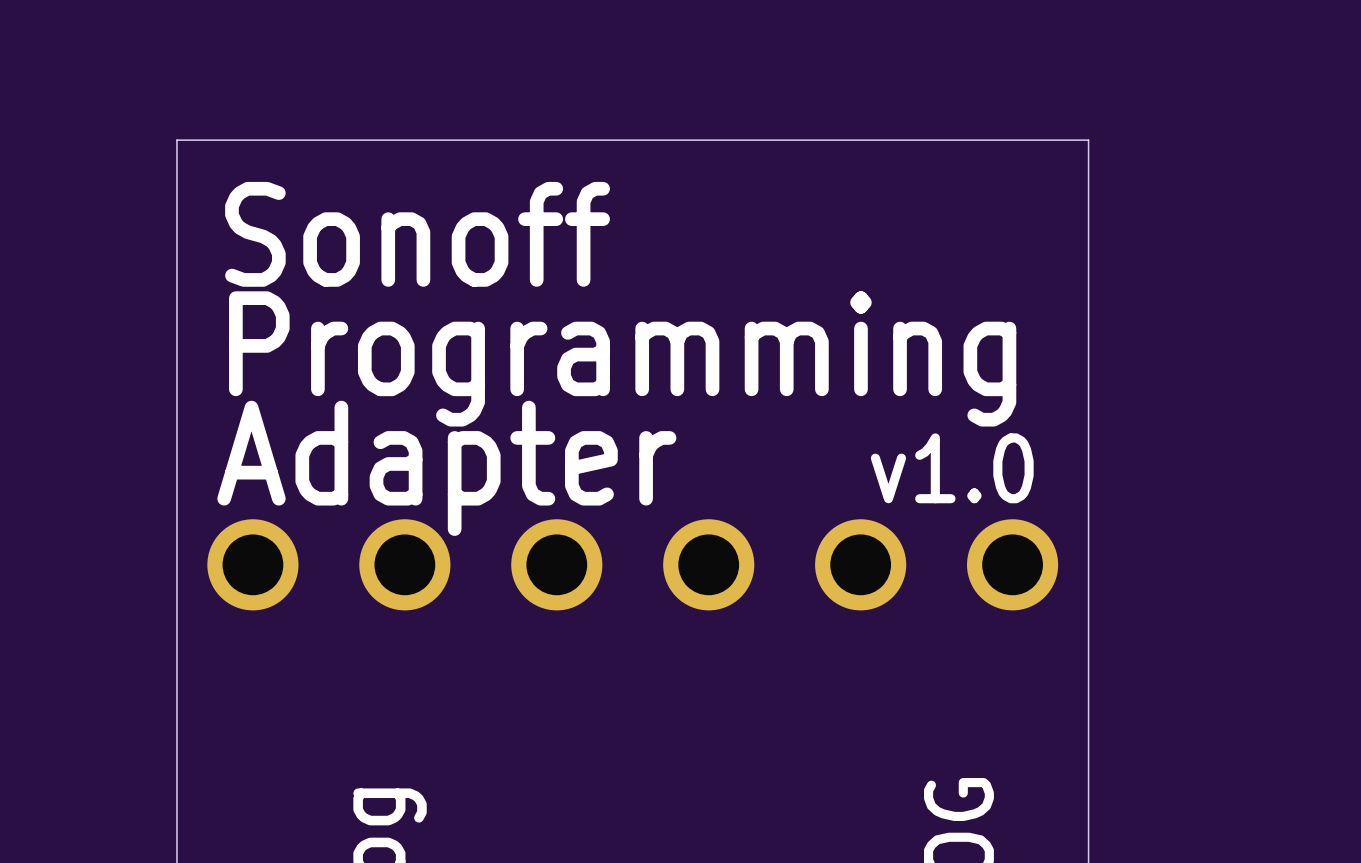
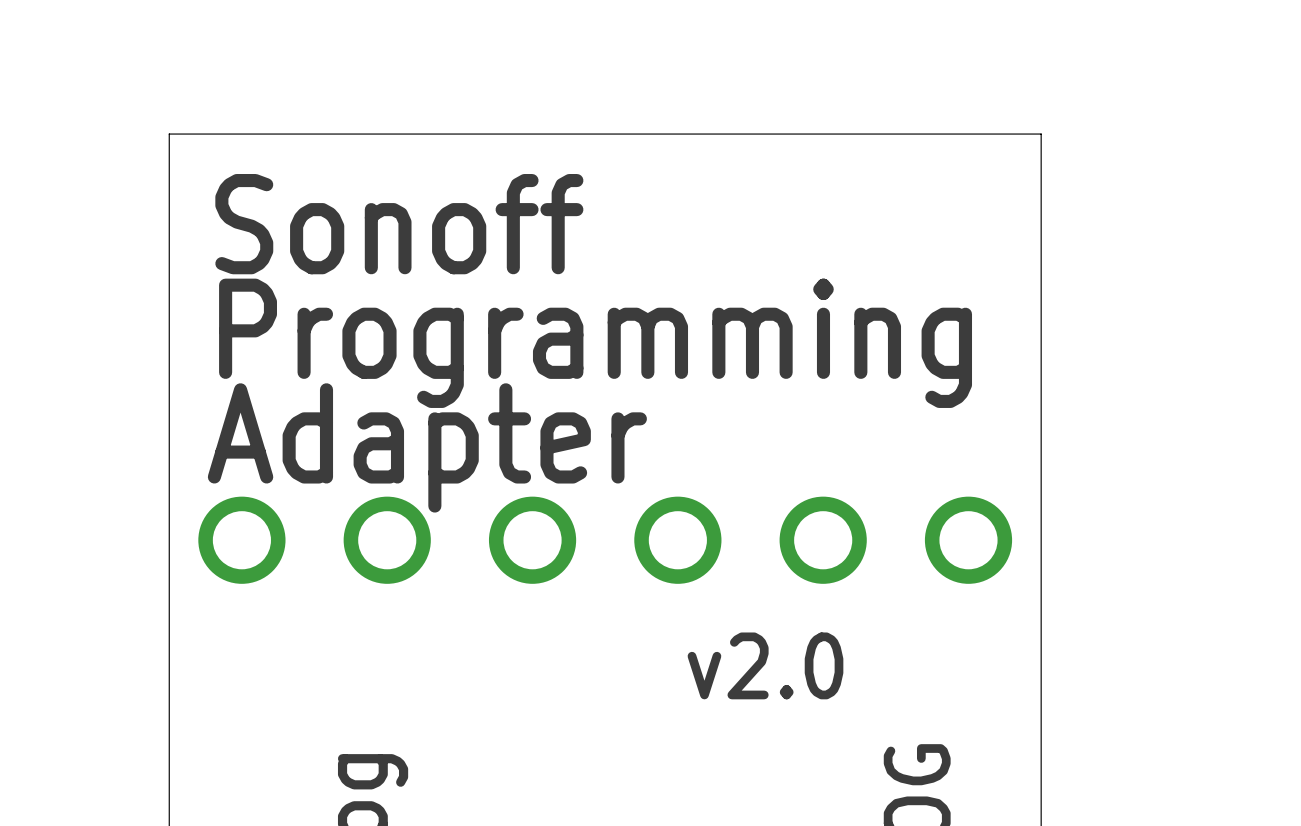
text: v1.0 (952, 468) -> none
text: none -> v2.0 (765, 665)

